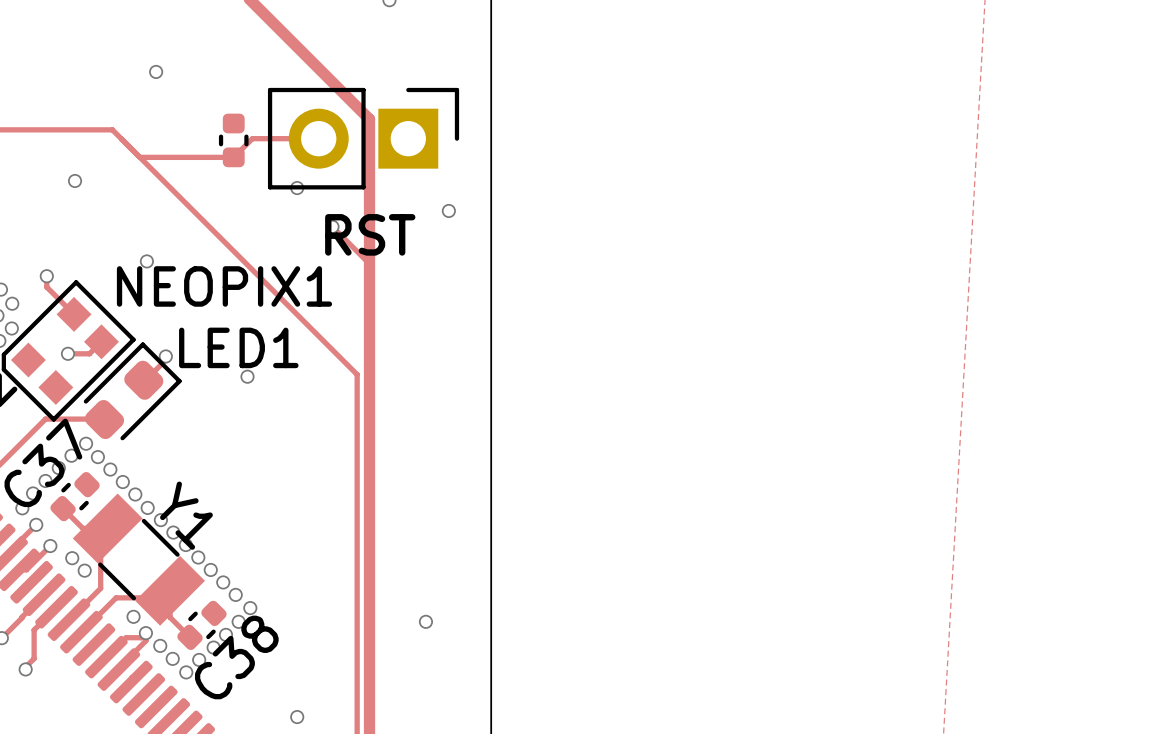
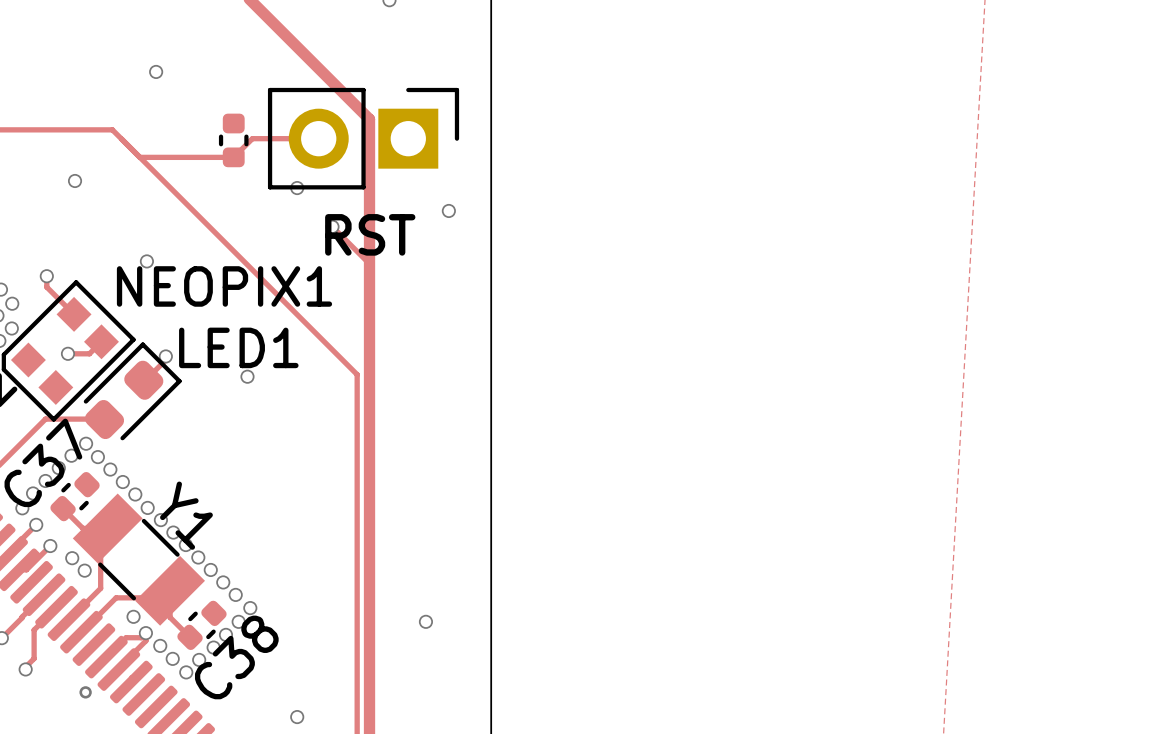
via: none -> (85, 692)

